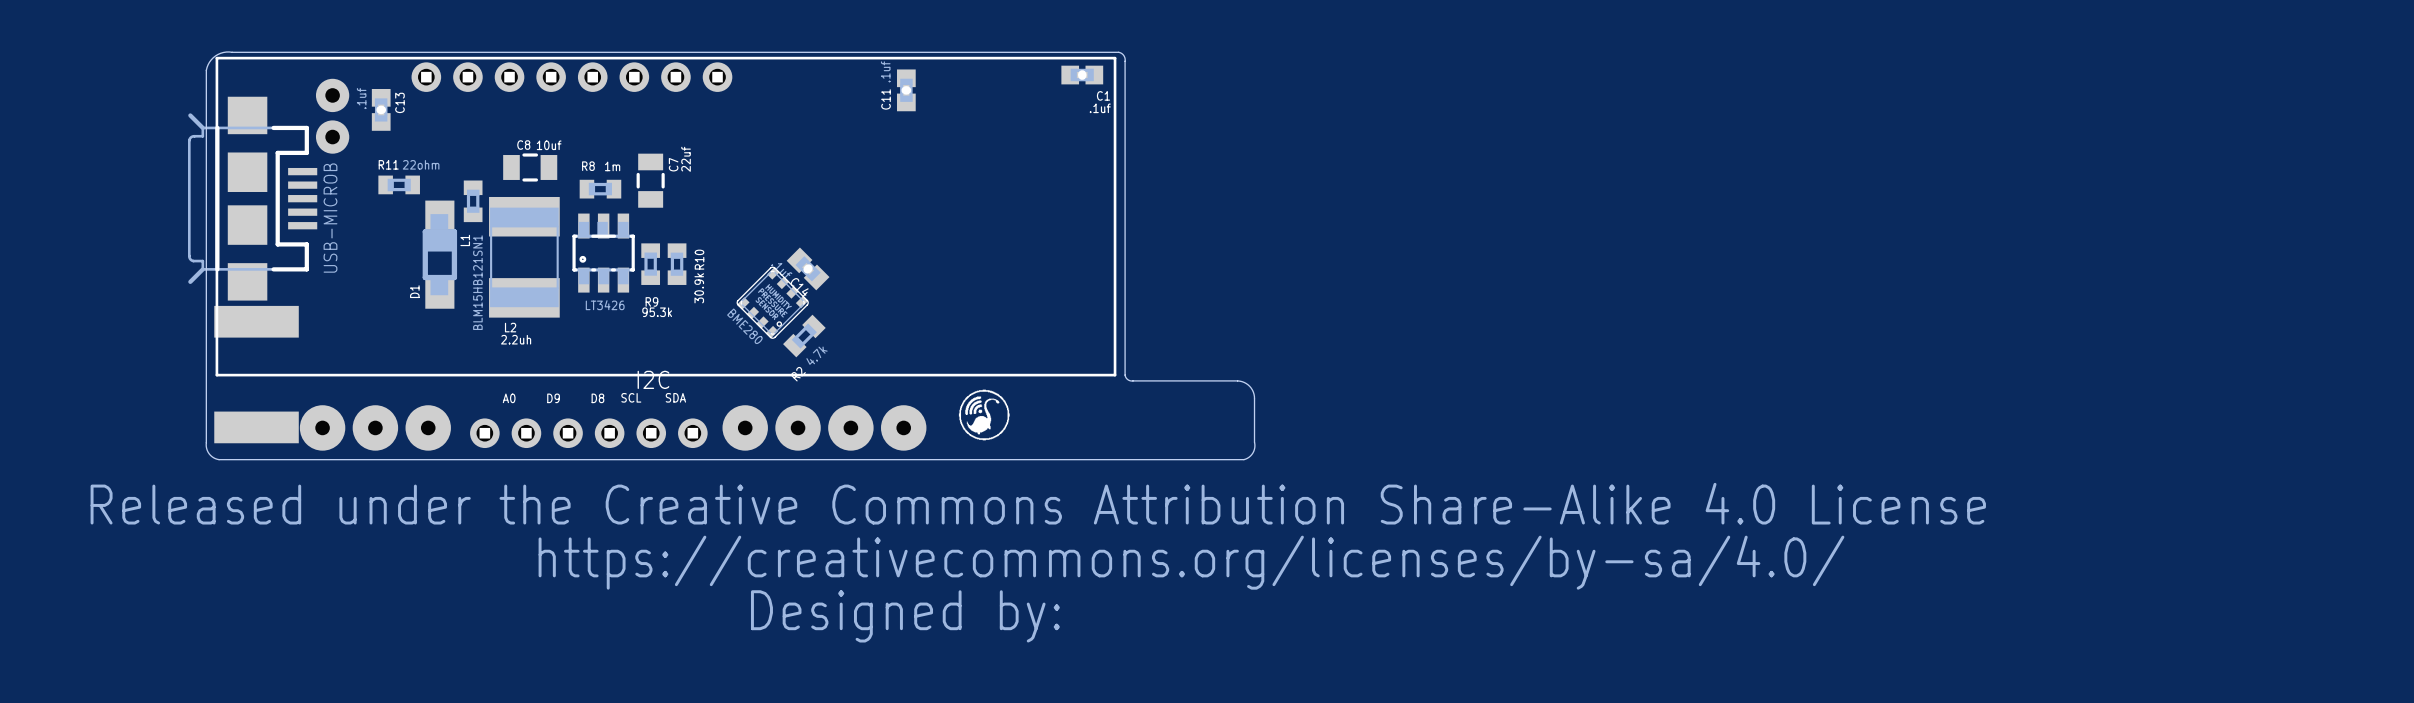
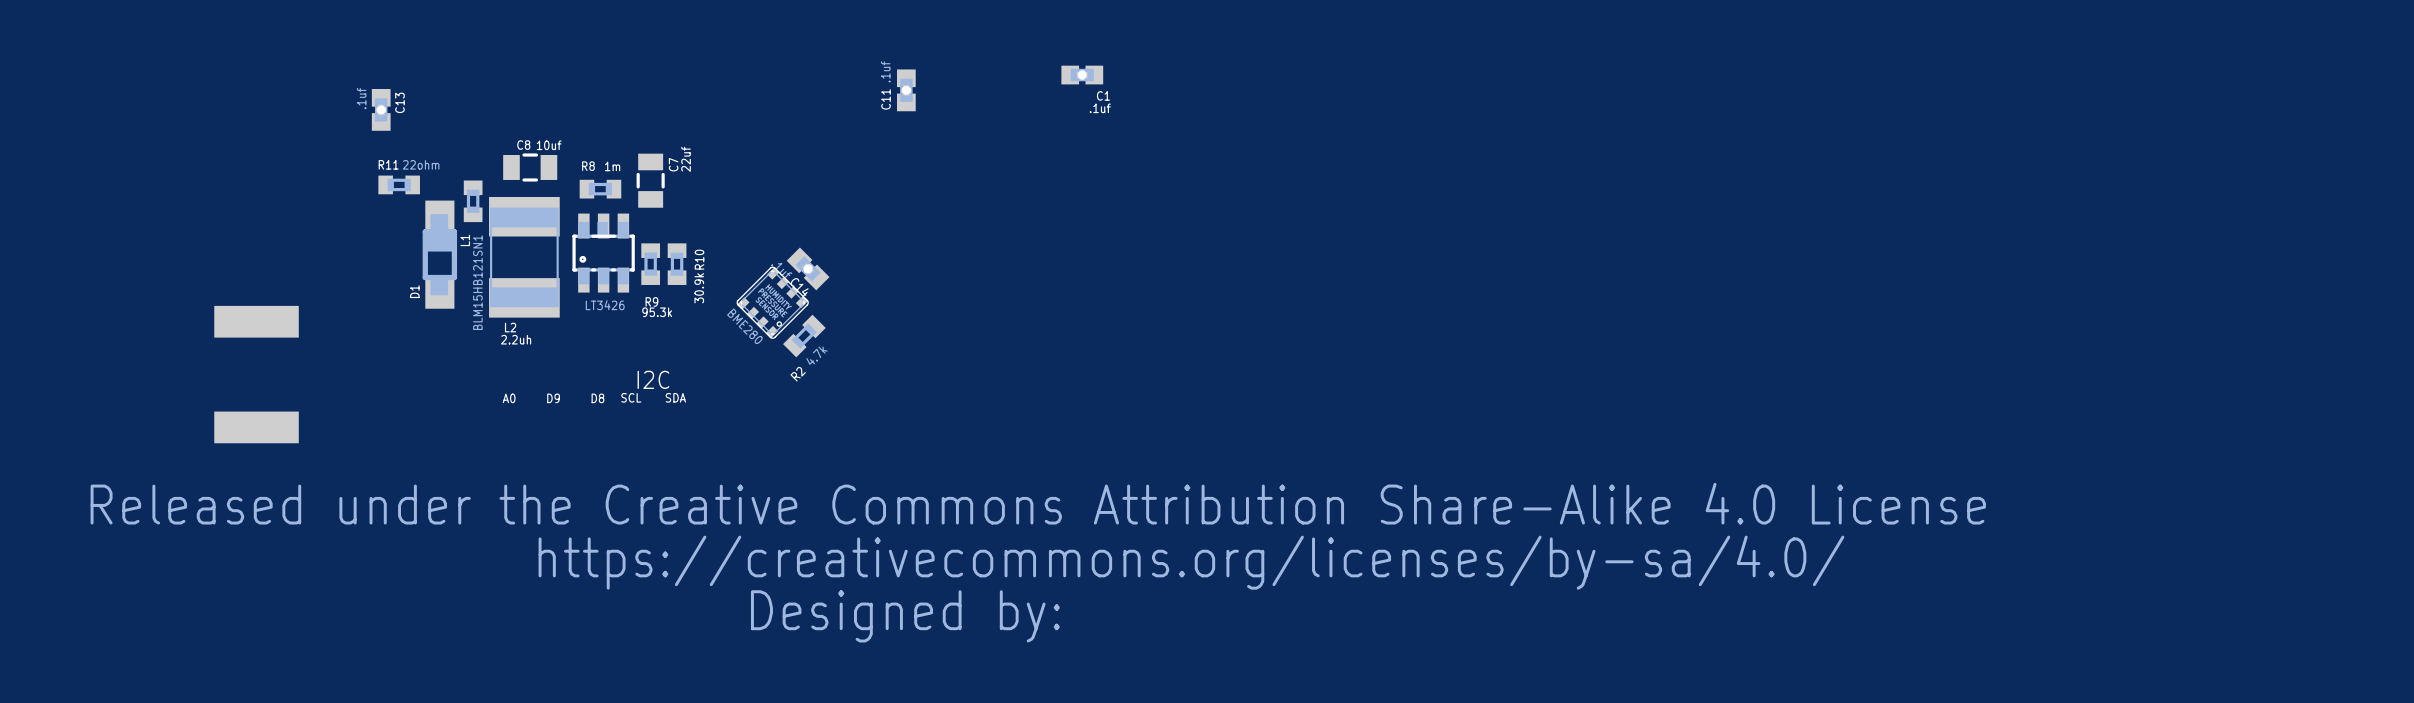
board edge: (232, 52) (1120, 52) (1125, 60) (1125, 376) (1131, 380) (1237, 380) (1246, 383) (1251, 388) (1254, 396) (1253, 451) (1243, 459) (215, 458) (209, 453) (206, 444) (206, 70) (209, 62) (215, 55) (223, 52) (232, 52) -> none
part: (571, 77) -> none
part: (332, 116) -> none
part: USB-MICROB (252, 198) -> none
part: (665, 253) -> none
drawing: [958, 389, 1010, 441] -> none
part: (588, 433) -> none

